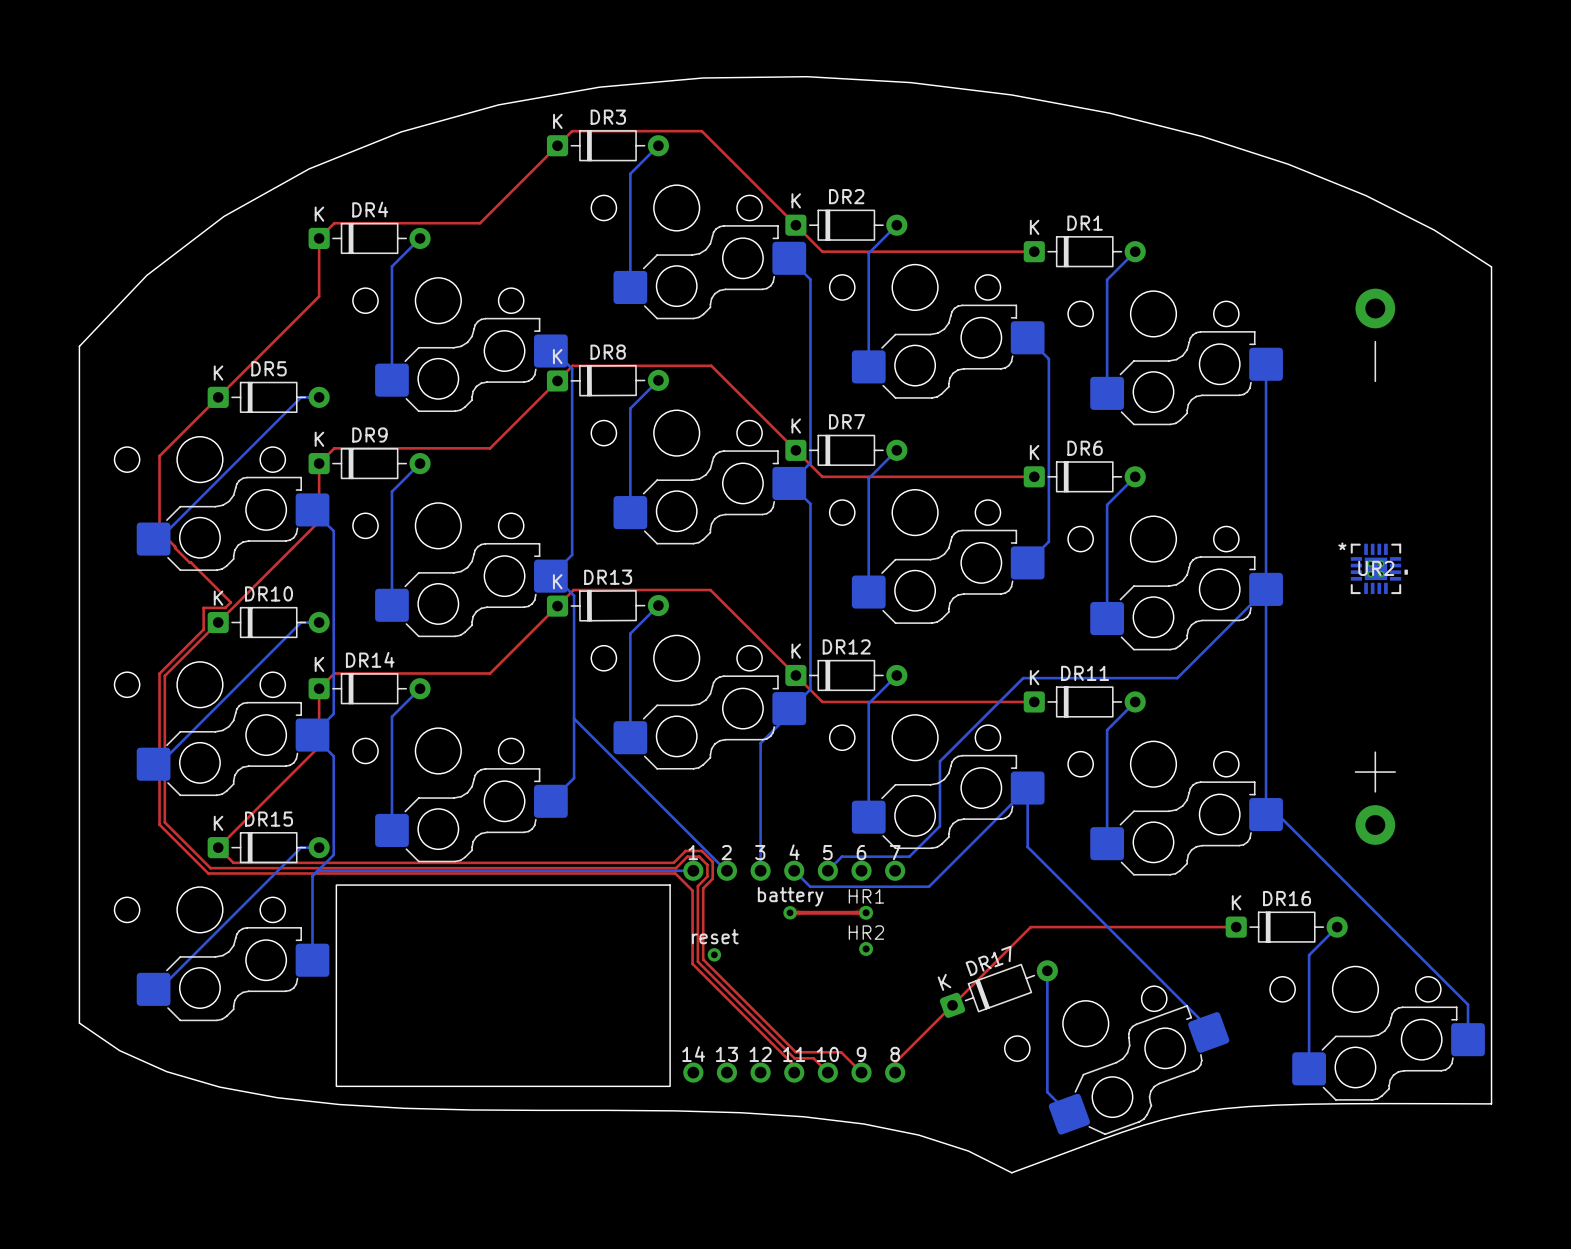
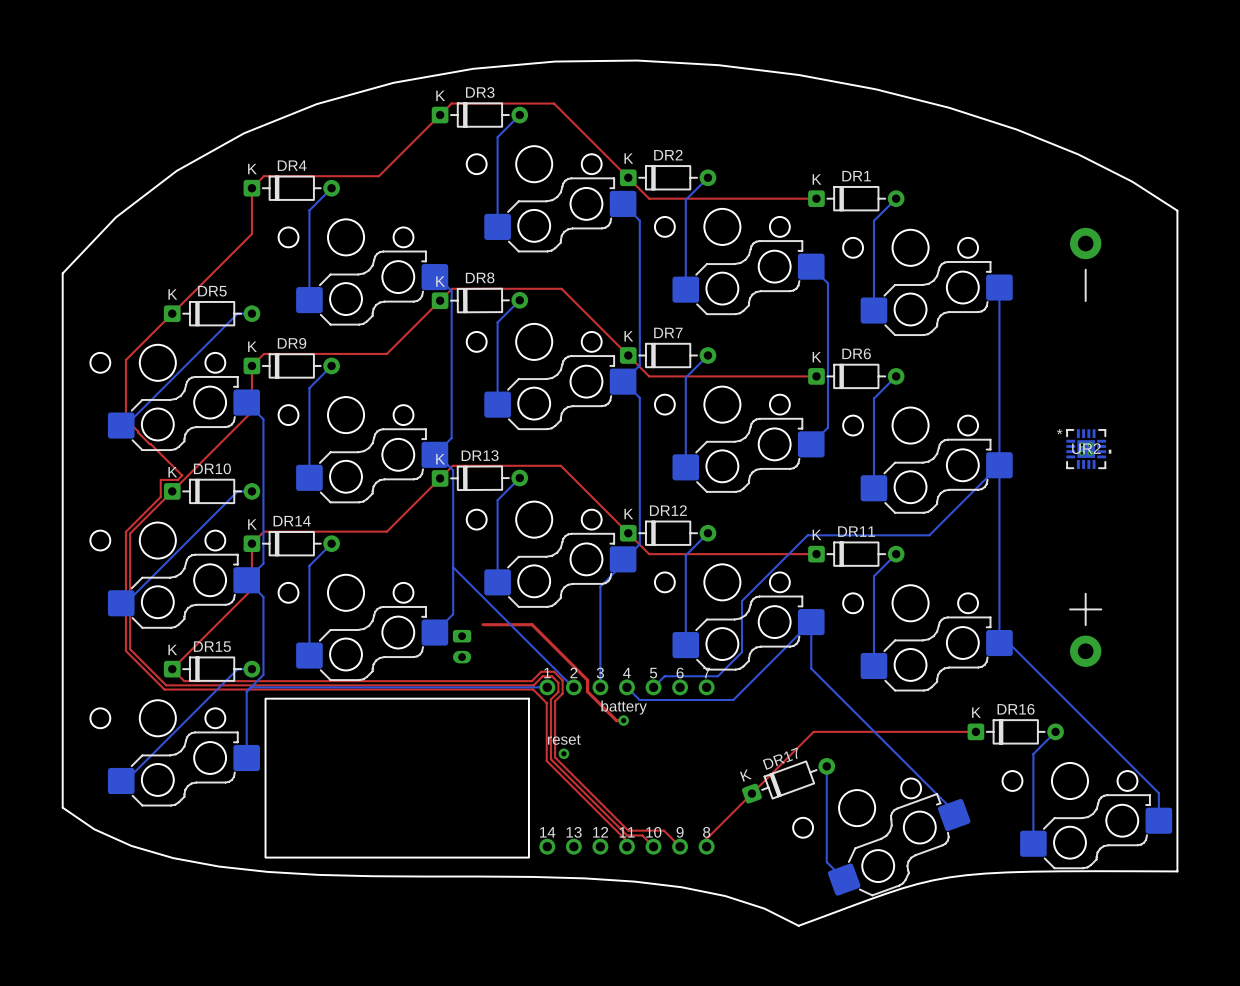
part: none -> (462, 646)
top track: (866, 912) (790, 912) -> (482, 624) (532, 624) (587, 680) (587, 691) (616, 720) (623, 720)
HR1: (866, 912) -> none
HR2: (866, 948) -> none

